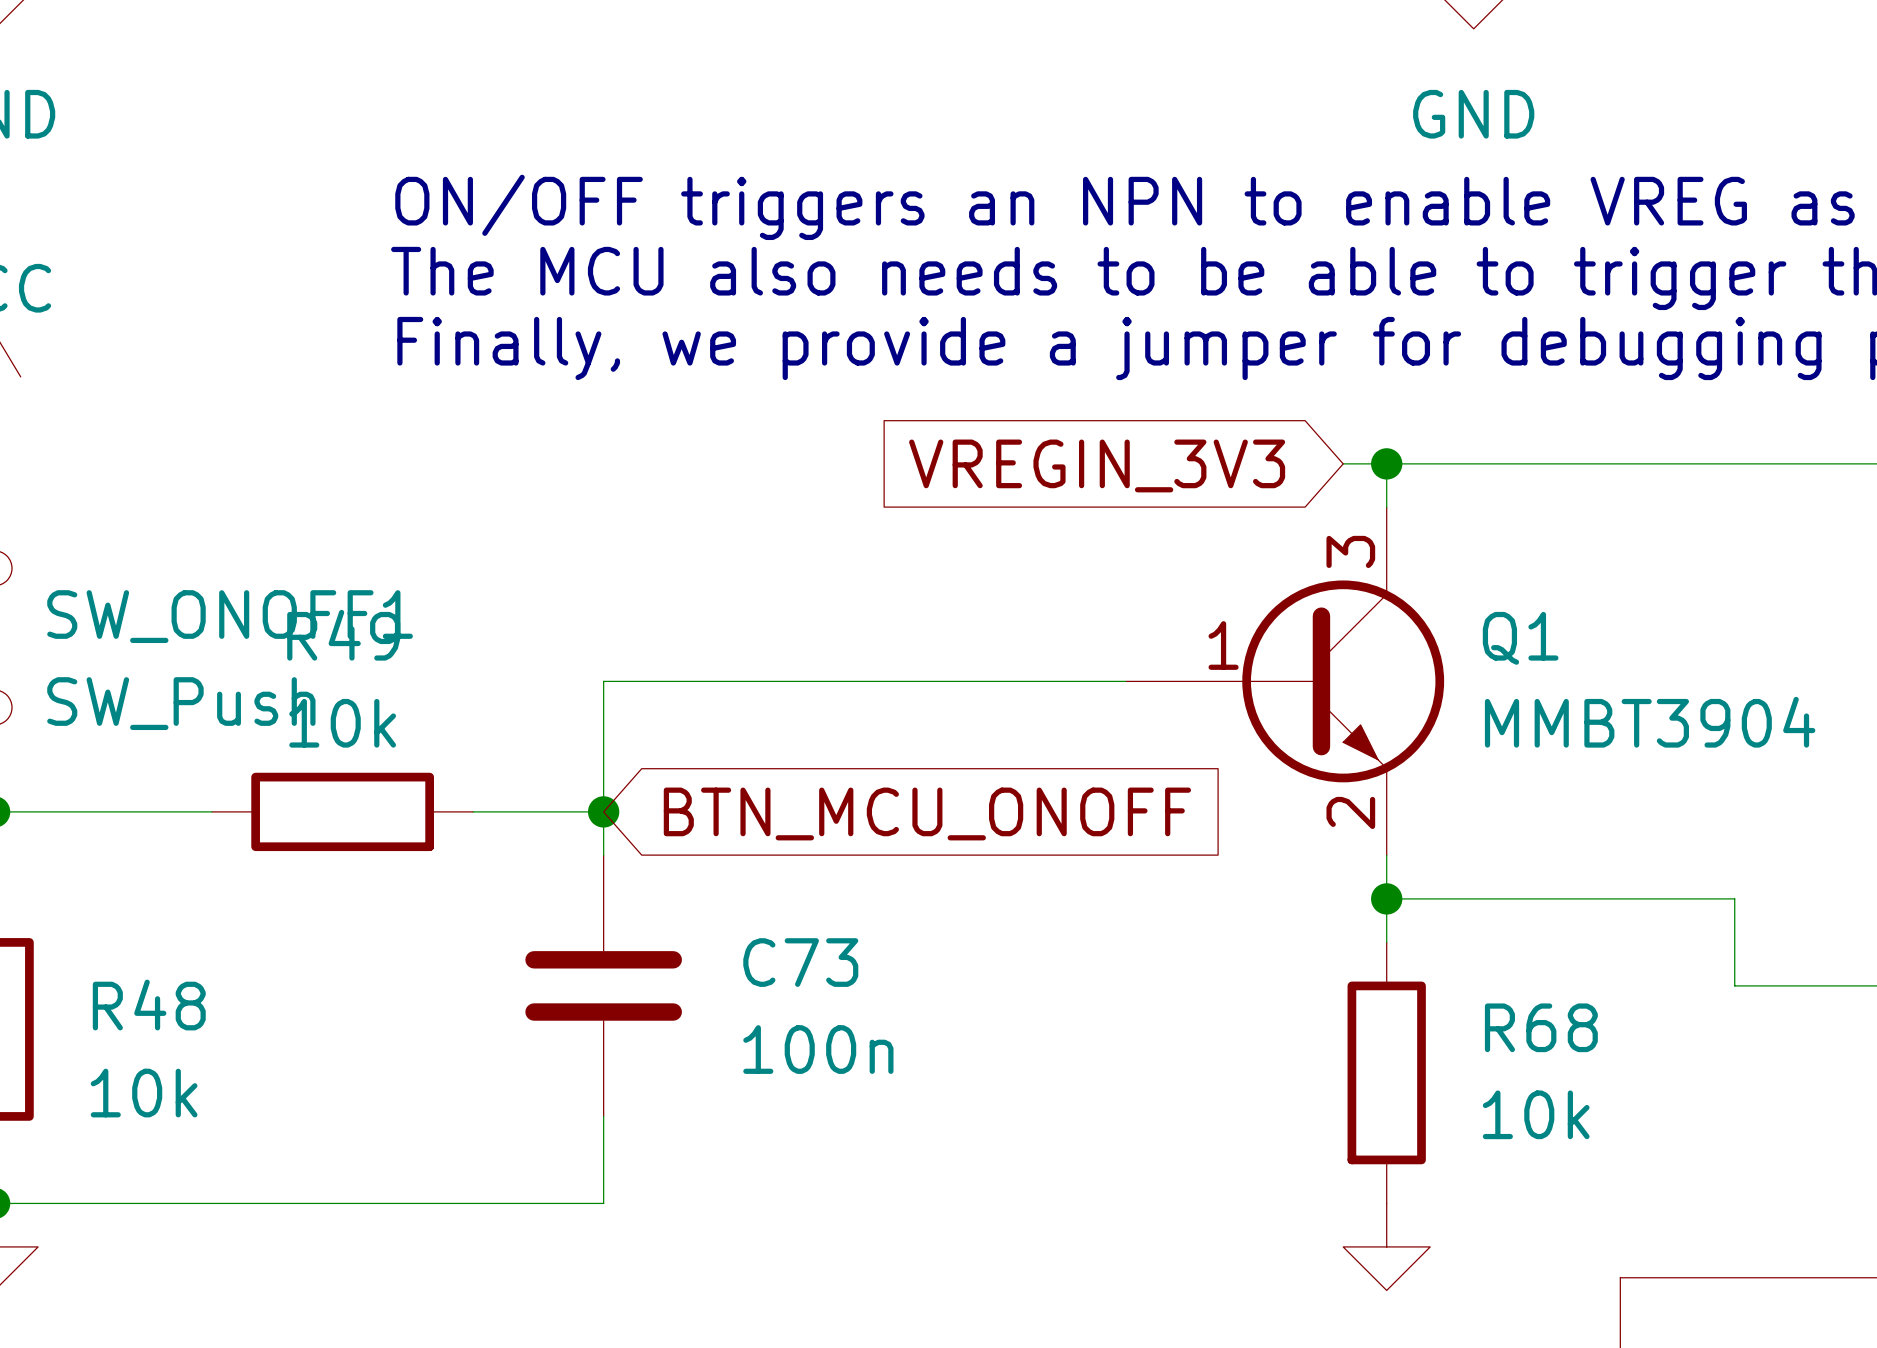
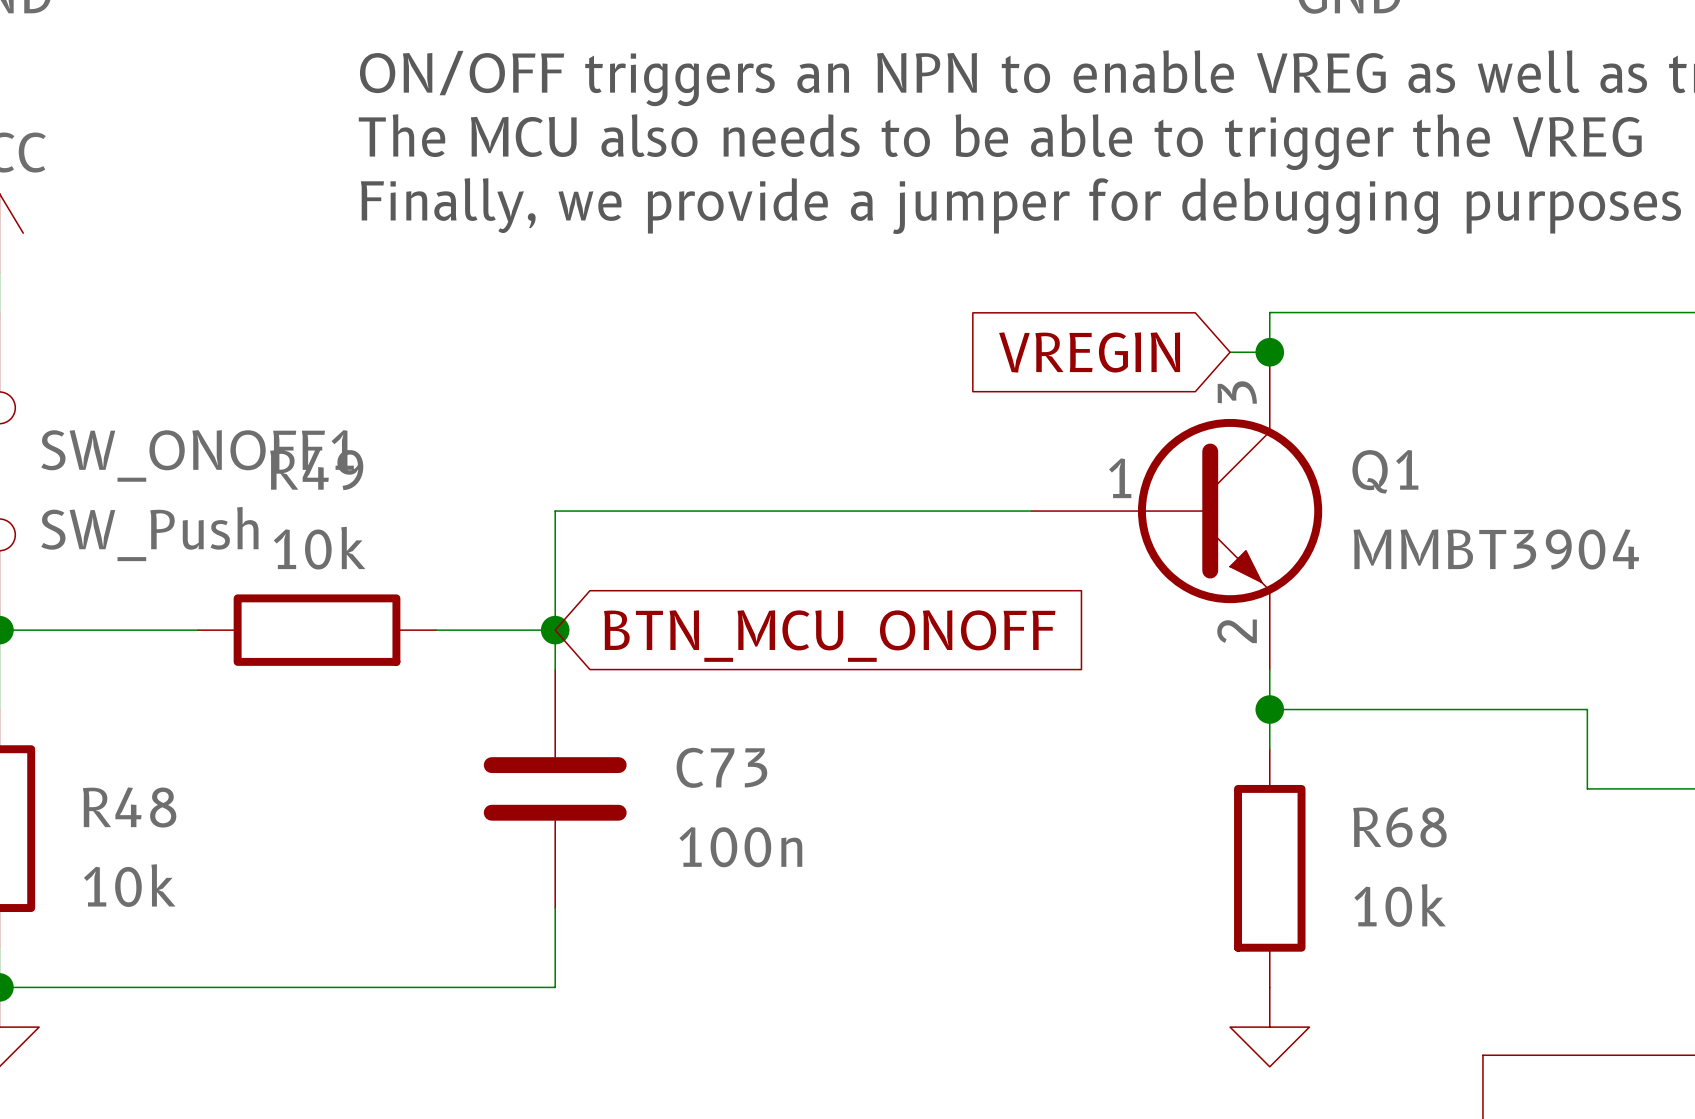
wire: (1343, 463) (1386, 463) -> (1230, 352) (1269, 352)
junction position: (1386, 463) -> (1269, 352)
global label: VREGIN_3V3 (1097, 465) -> VREGIN (1089, 352)

